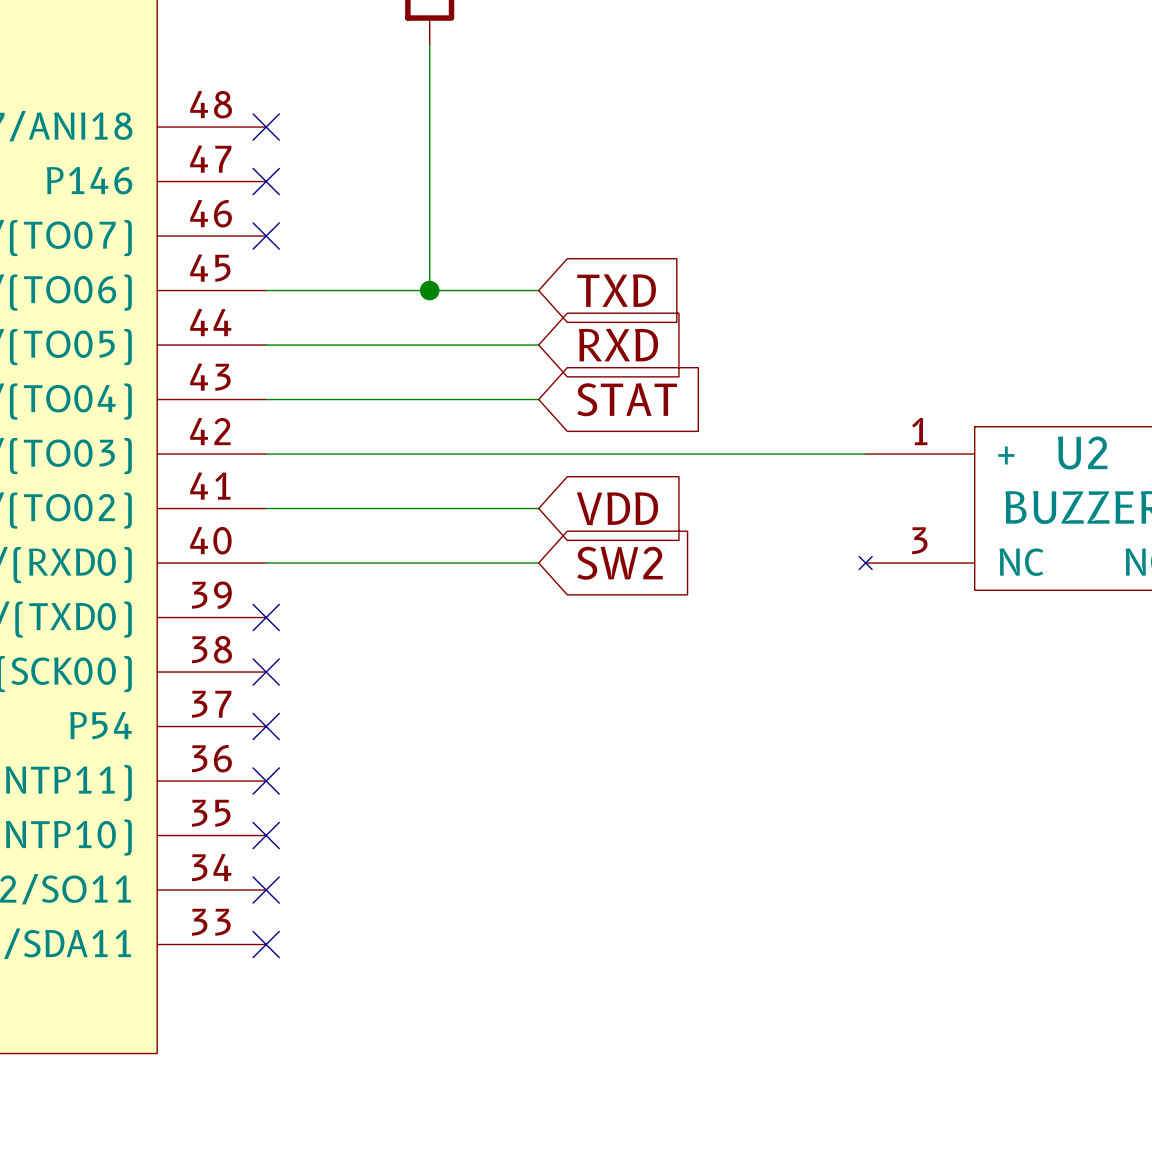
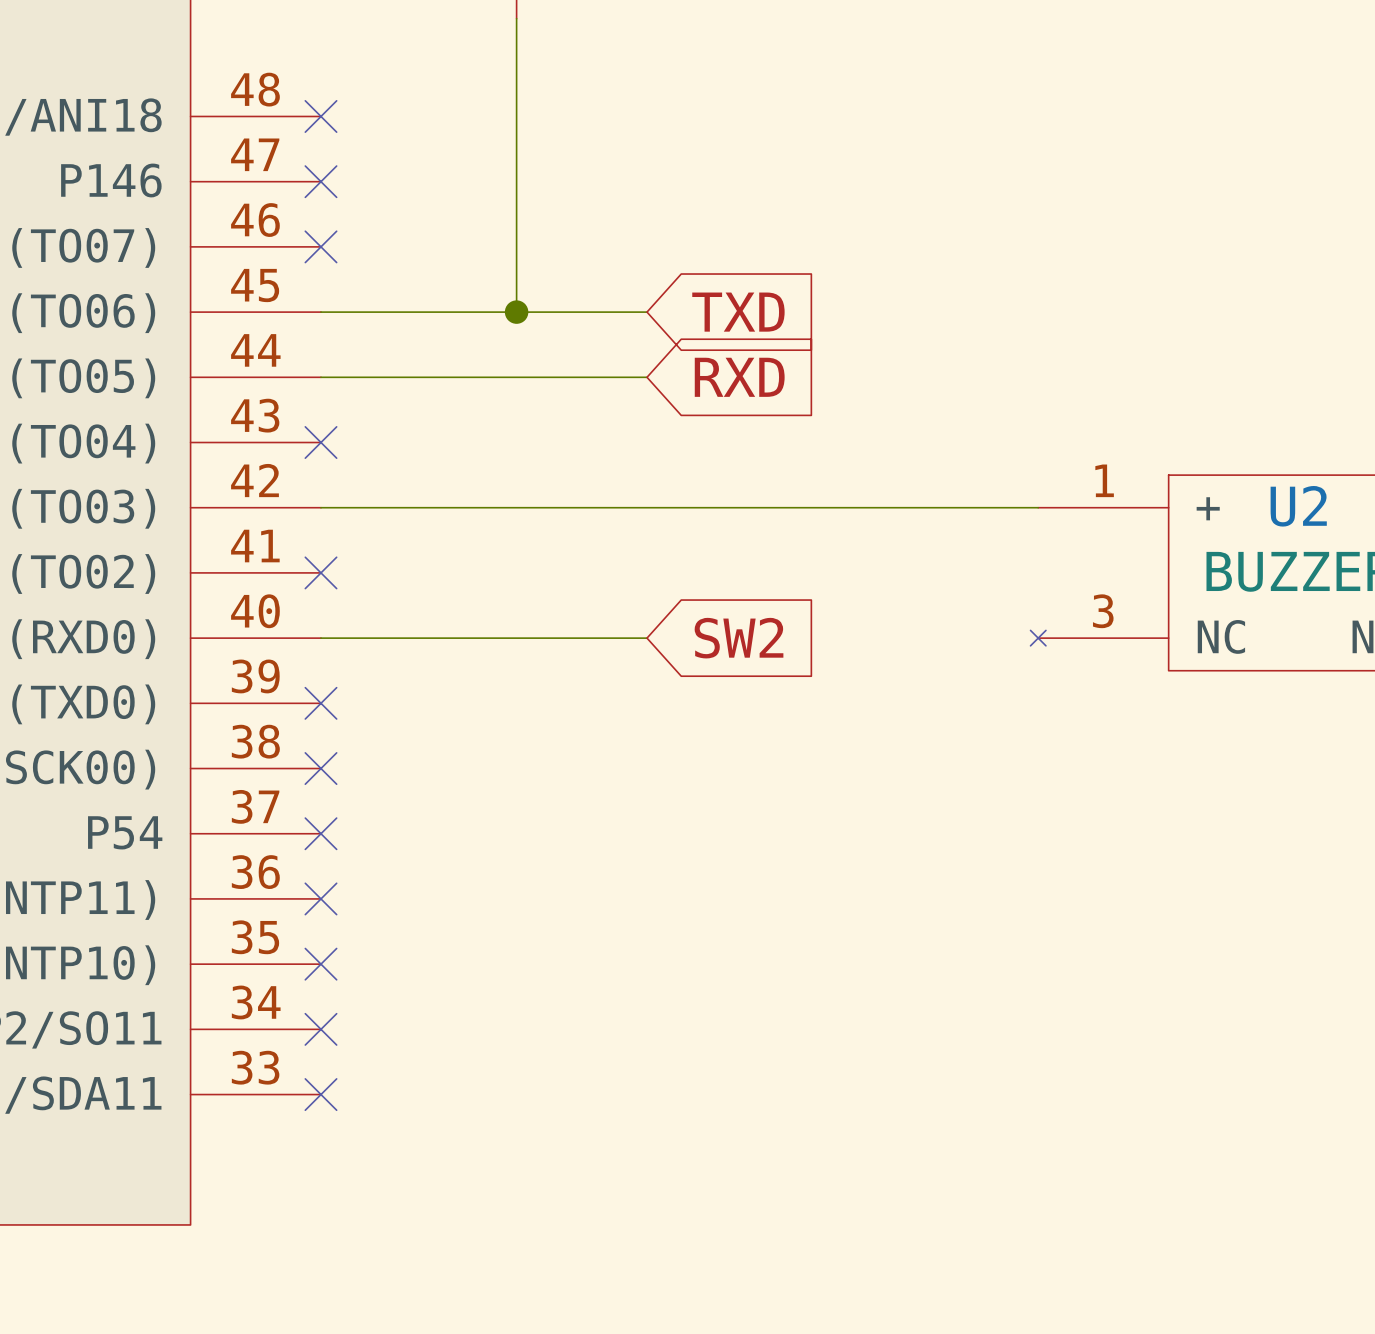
wire: (266, 399) (538, 399) -> none
no-connect mark: none -> (320, 442)
global label: STAT (627, 399) -> none
wire: (266, 508) (538, 508) -> none
no-connect mark: none -> (320, 572)
global label: VDD (617, 508) -> none

